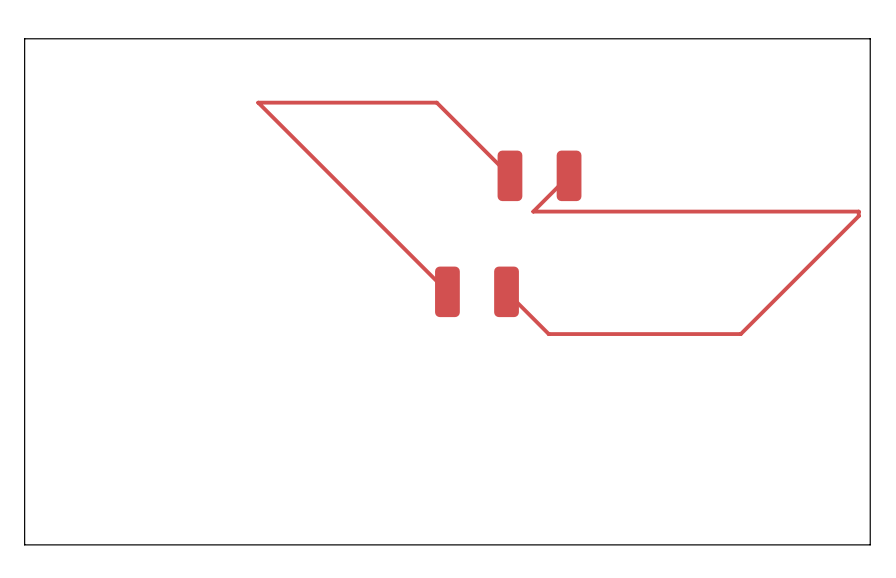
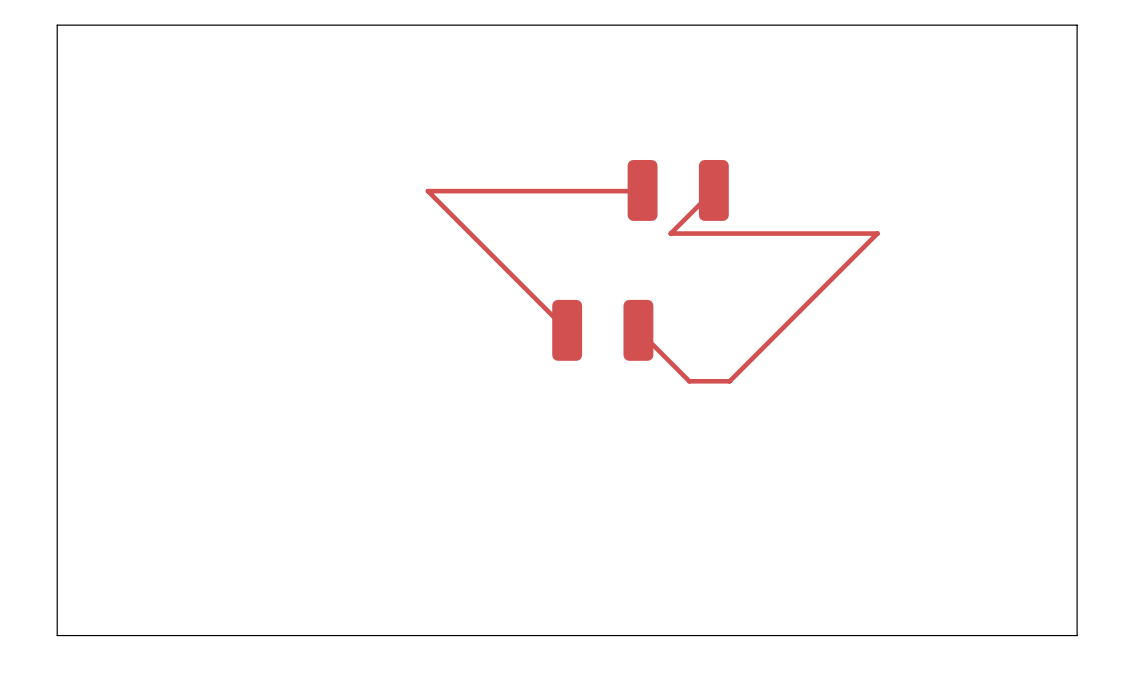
top track: (509, 175) (436, 102) (258, 102) (332, 176) -> (642, 190) (427, 191)
top track: (704, 211) (858, 211) (858, 216) (740, 334) (582, 334) -> (877, 233) (729, 381)

